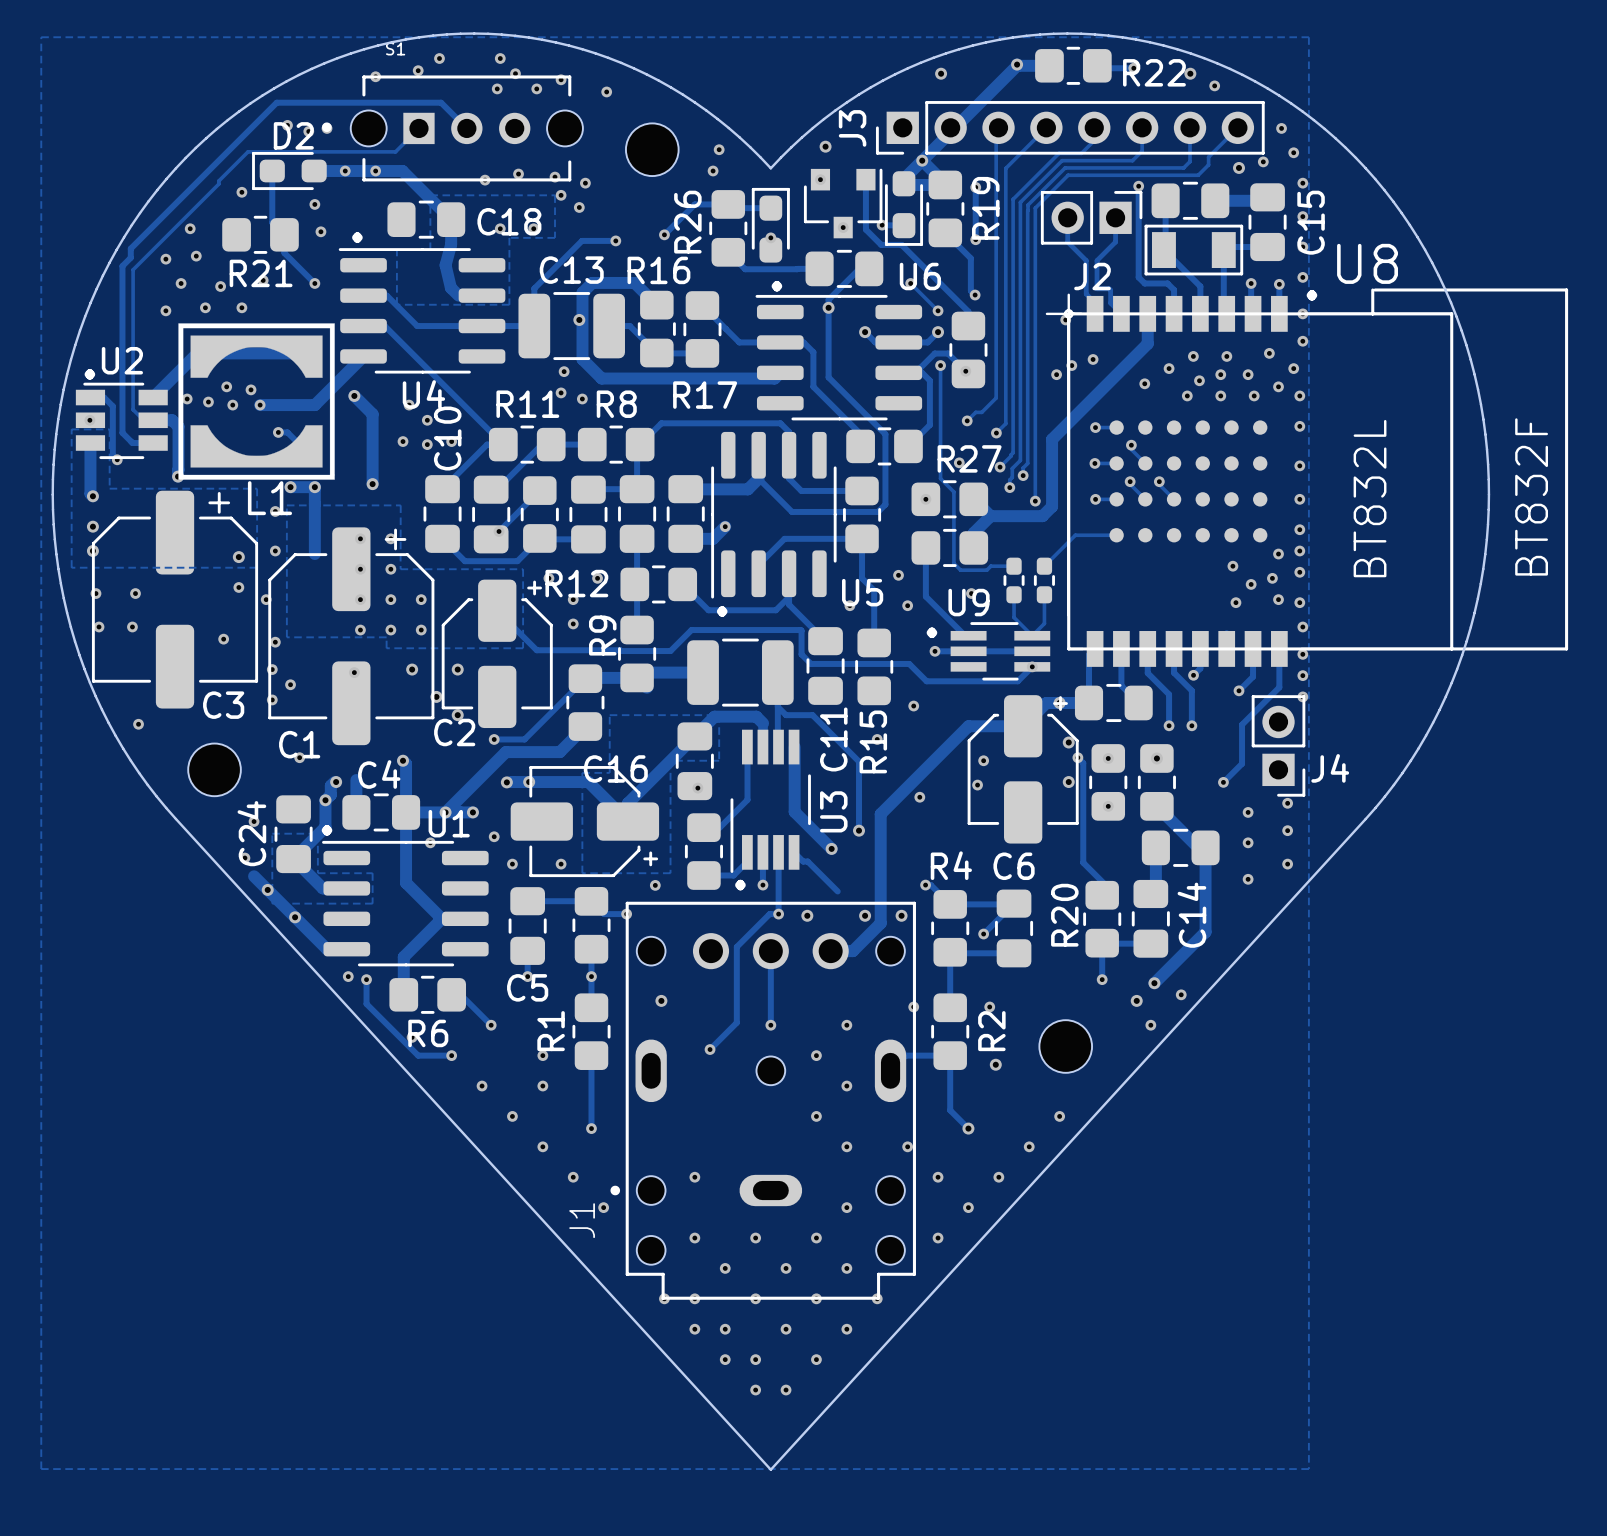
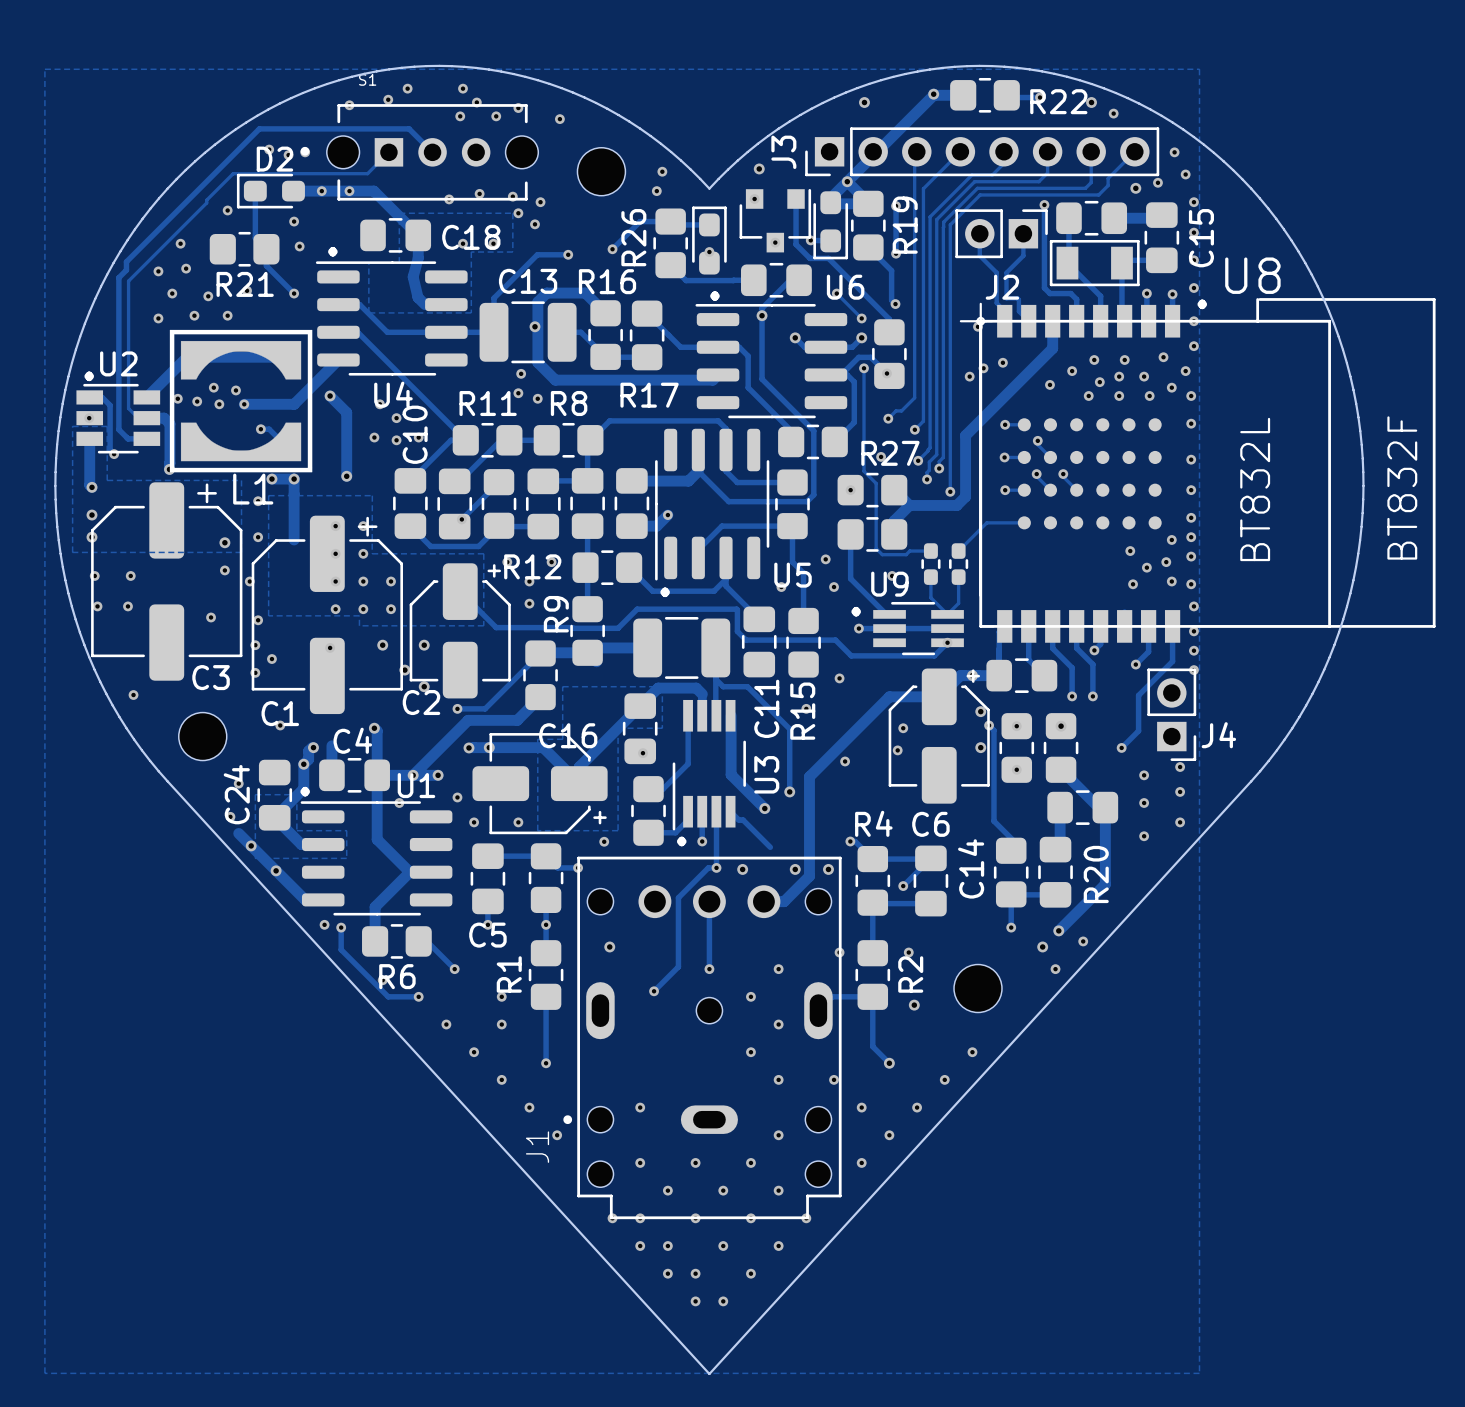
R20 name position: R20 (1064, 915) -> R20 (1096, 874)
C14 name position: C14 (1191, 915) -> C14 (971, 868)

